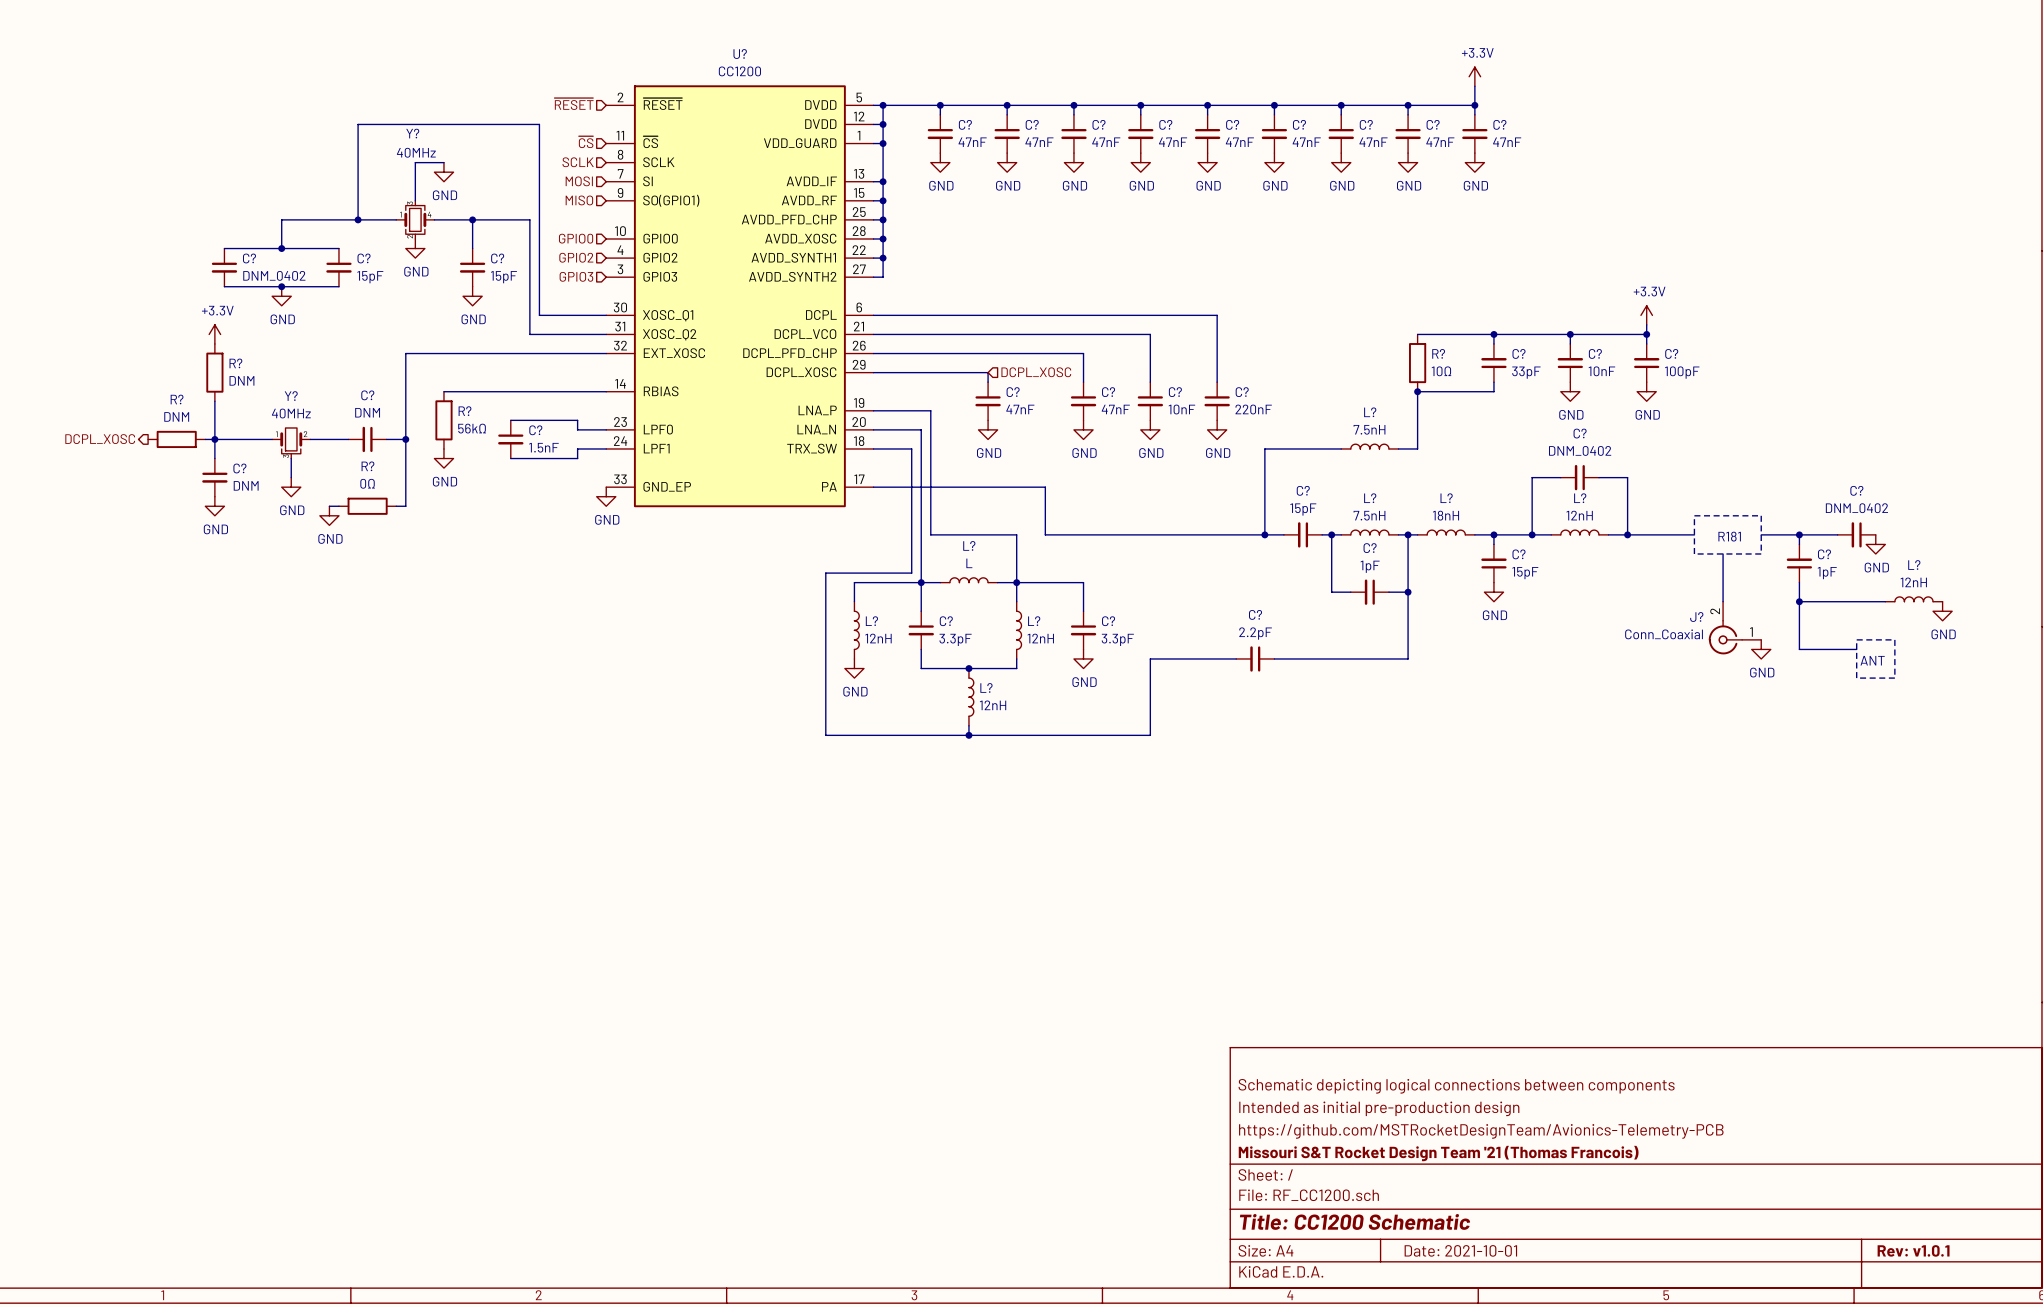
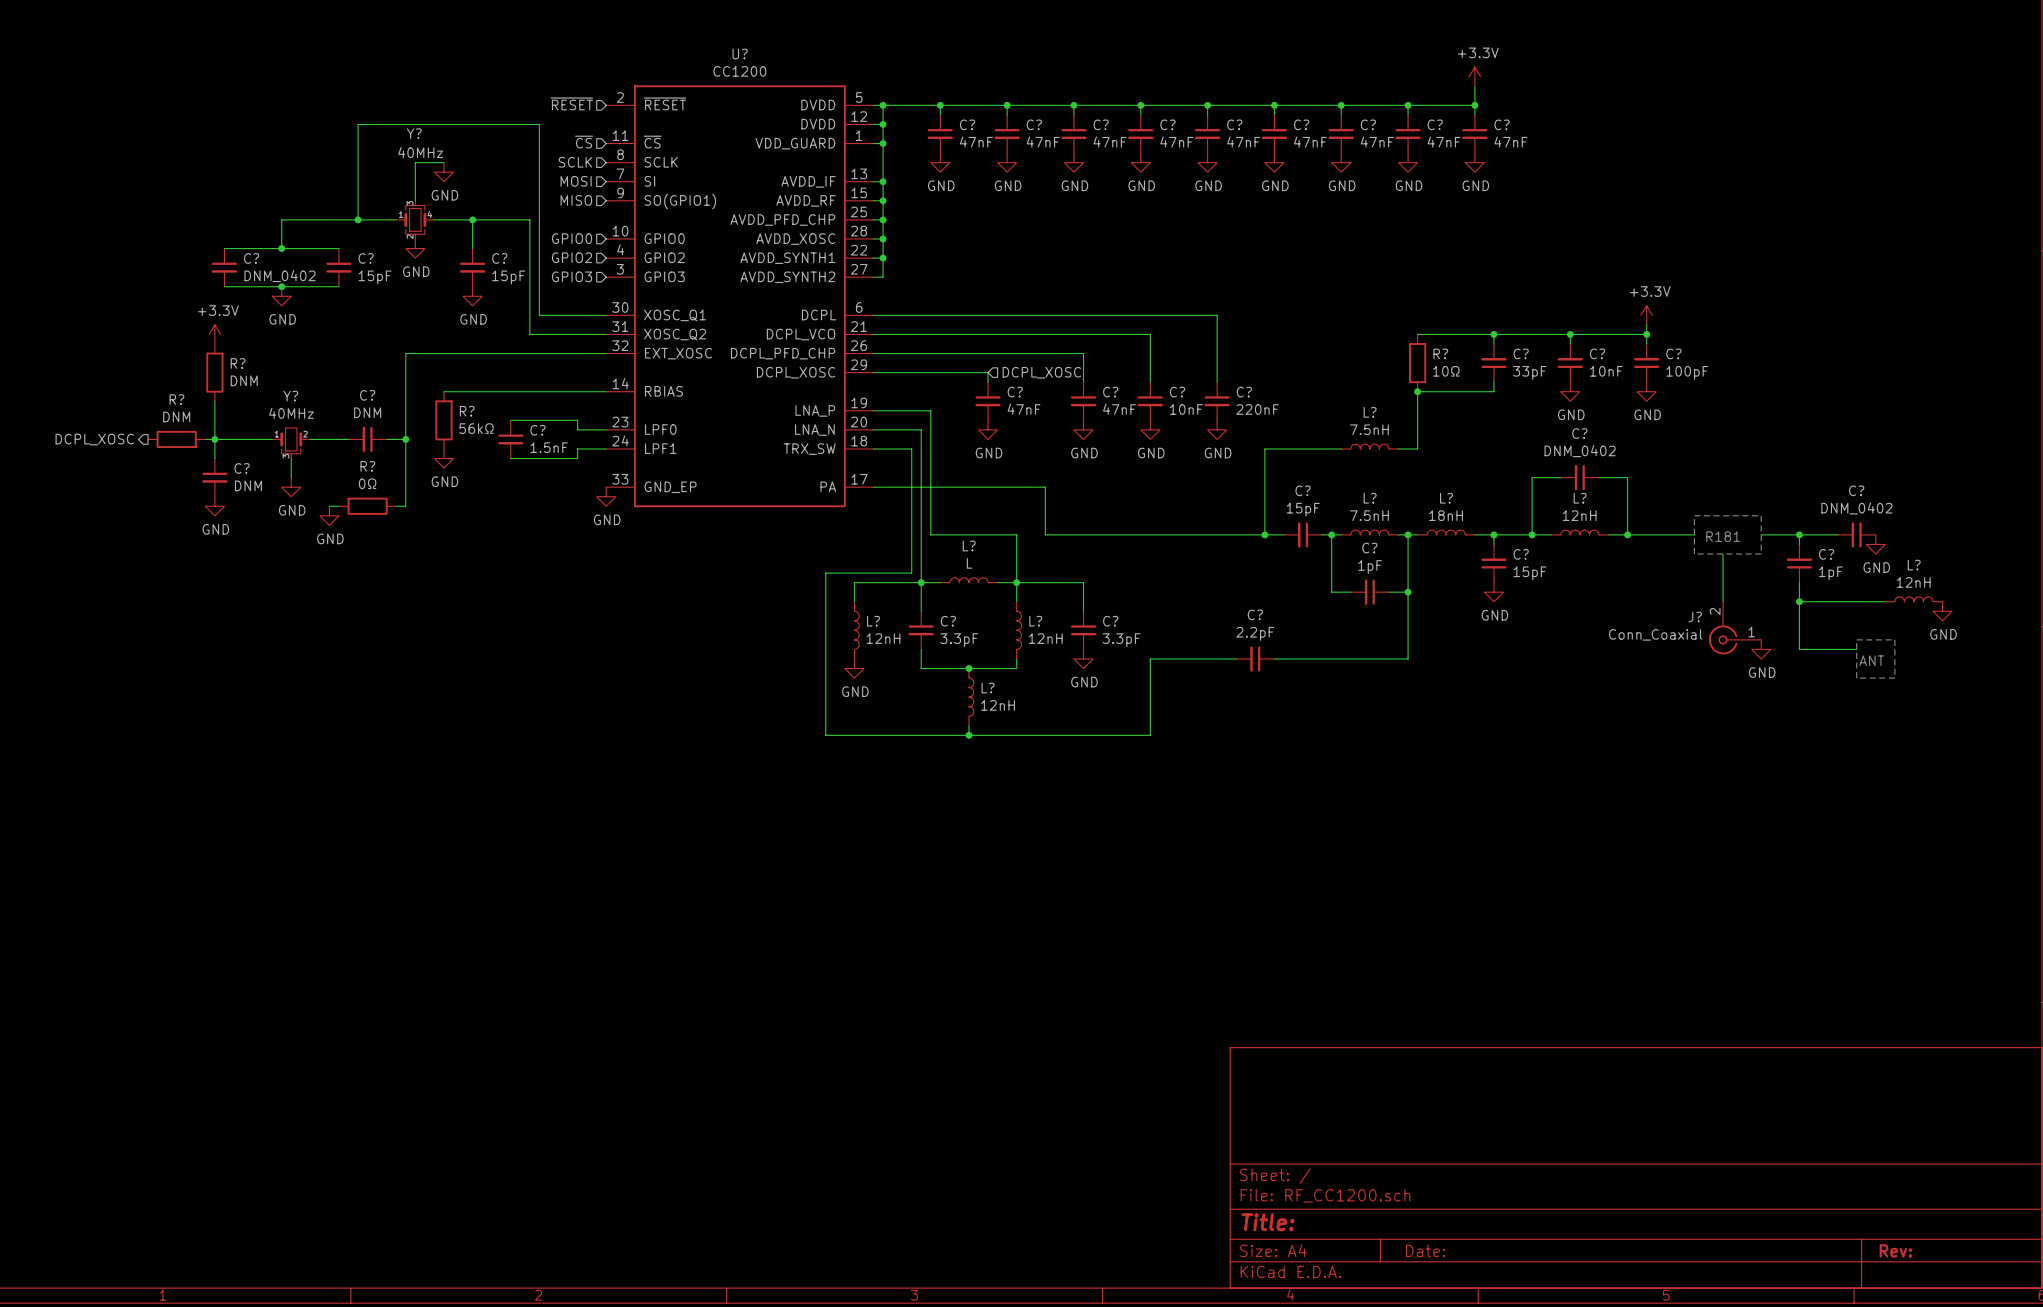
title block: Schematic depicting logical connections between components (1456, 1086) -> none
title block: Intended as initial pre-production design (1379, 1108) -> none
title block: https://github.com/MSTRocketDesignTeam/Avionics-Telemetry-PCB (1481, 1131) -> none
title block: Missouri S&T Rocket Design Team '21 (Thomas Francois) (1438, 1153) -> none
title block: Title: CC1200 Schematic (1355, 1221) -> Title: (1268, 1222)
title block: Date: 2021-10-01 (1460, 1250) -> Date: (1425, 1250)
title block: Rev: v1.0.1 (1913, 1250) -> Rev: (1895, 1250)

